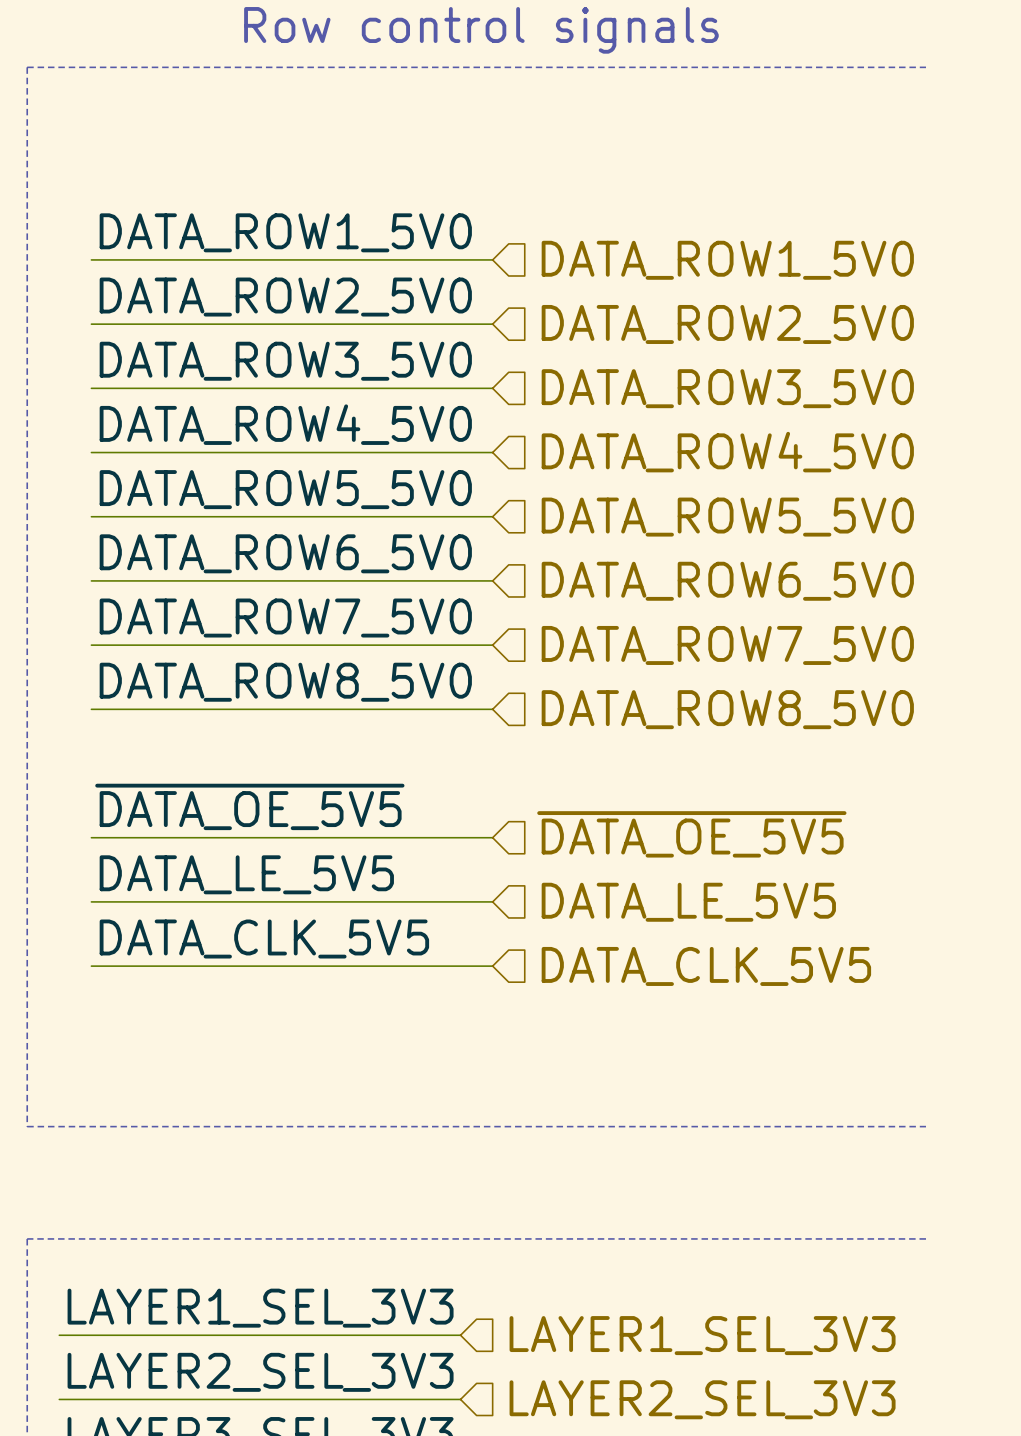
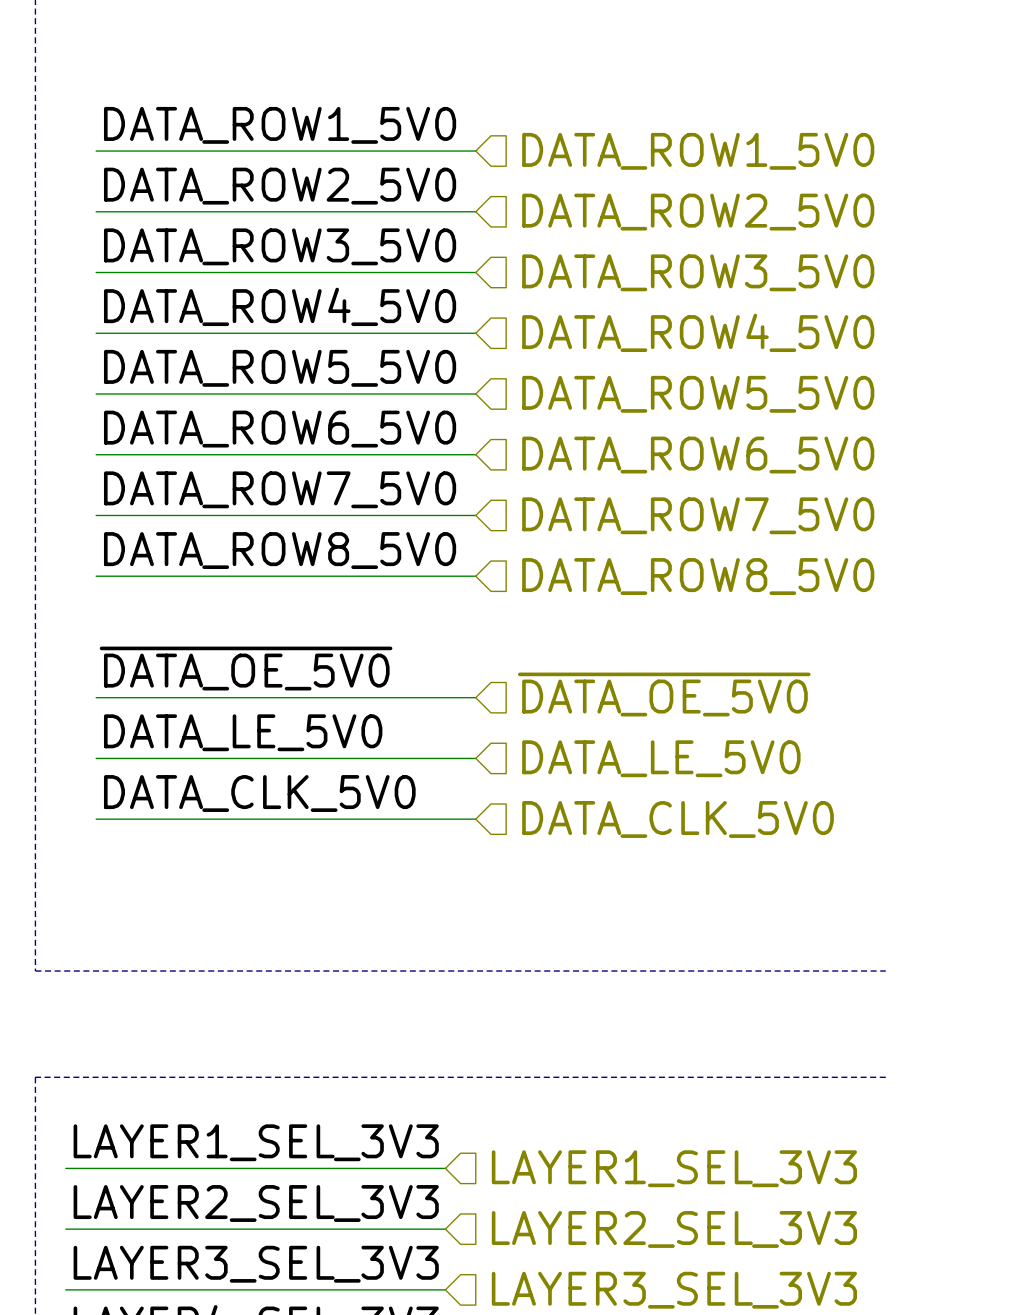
label: ~{DATA_OE_5V5} (249, 806) -> ~{DATA_OE_5V0} (246, 668)
hierarchical label: ~{DATA_OE_5V5} (691, 834) -> ~{DATA_OE_5V0} (664, 694)
label: DATA_LE_5V5 (246, 874) -> DATA_LE_5V0 (243, 732)
hierarchical label: DATA_LE_5V5 (688, 902) -> DATA_LE_5V0 (661, 758)
label: DATA_CLK_5V5 (264, 939) -> DATA_CLK_5V0 (259, 793)
hierarchical label: DATA_CLK_5V5 (706, 966) -> DATA_CLK_5V0 (678, 819)

